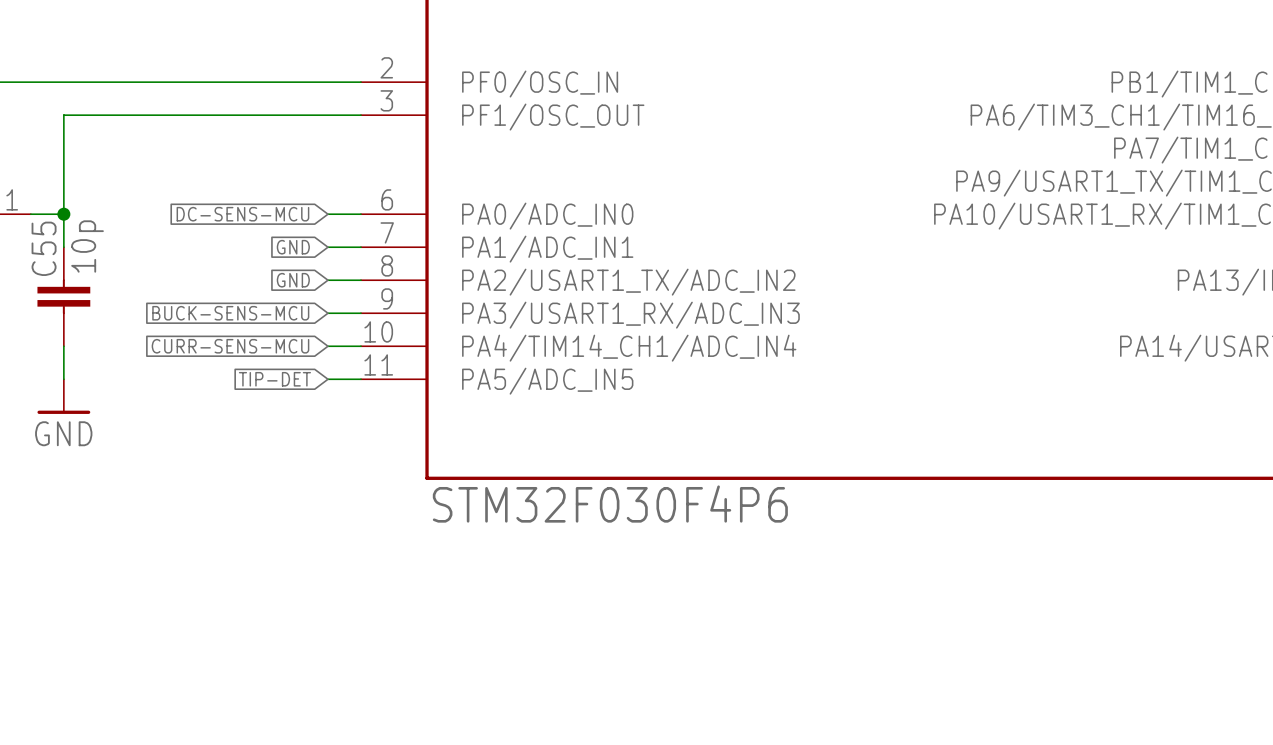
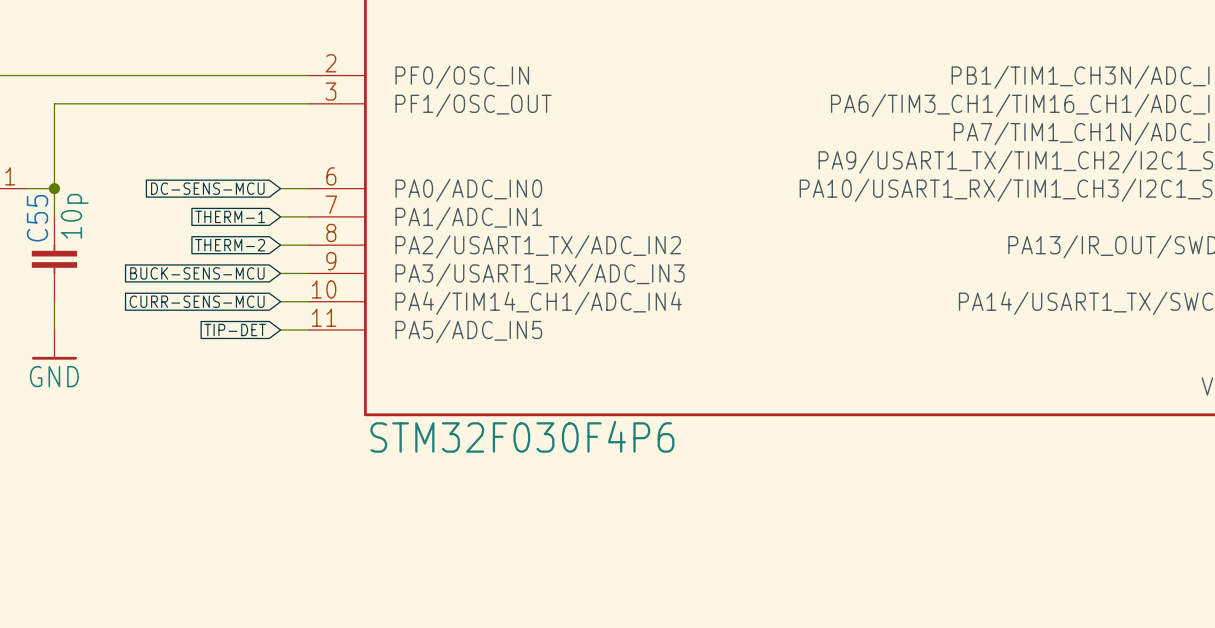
global label: GND (293, 247) -> THERM-1 (230, 216)
global label: GND (293, 280) -> THERM-2 (230, 245)

